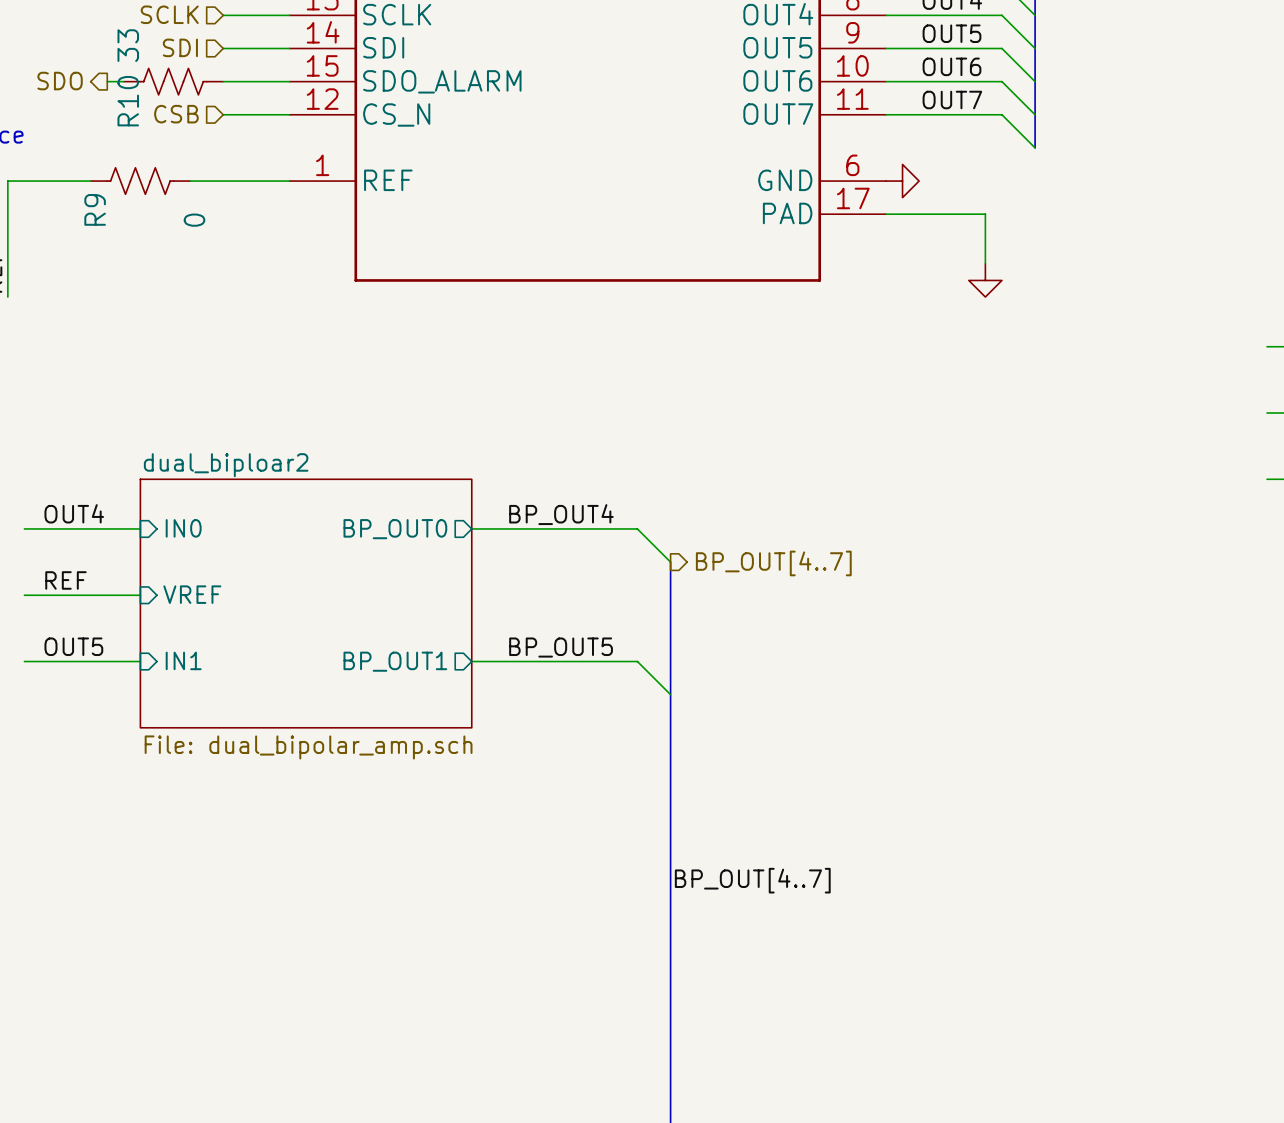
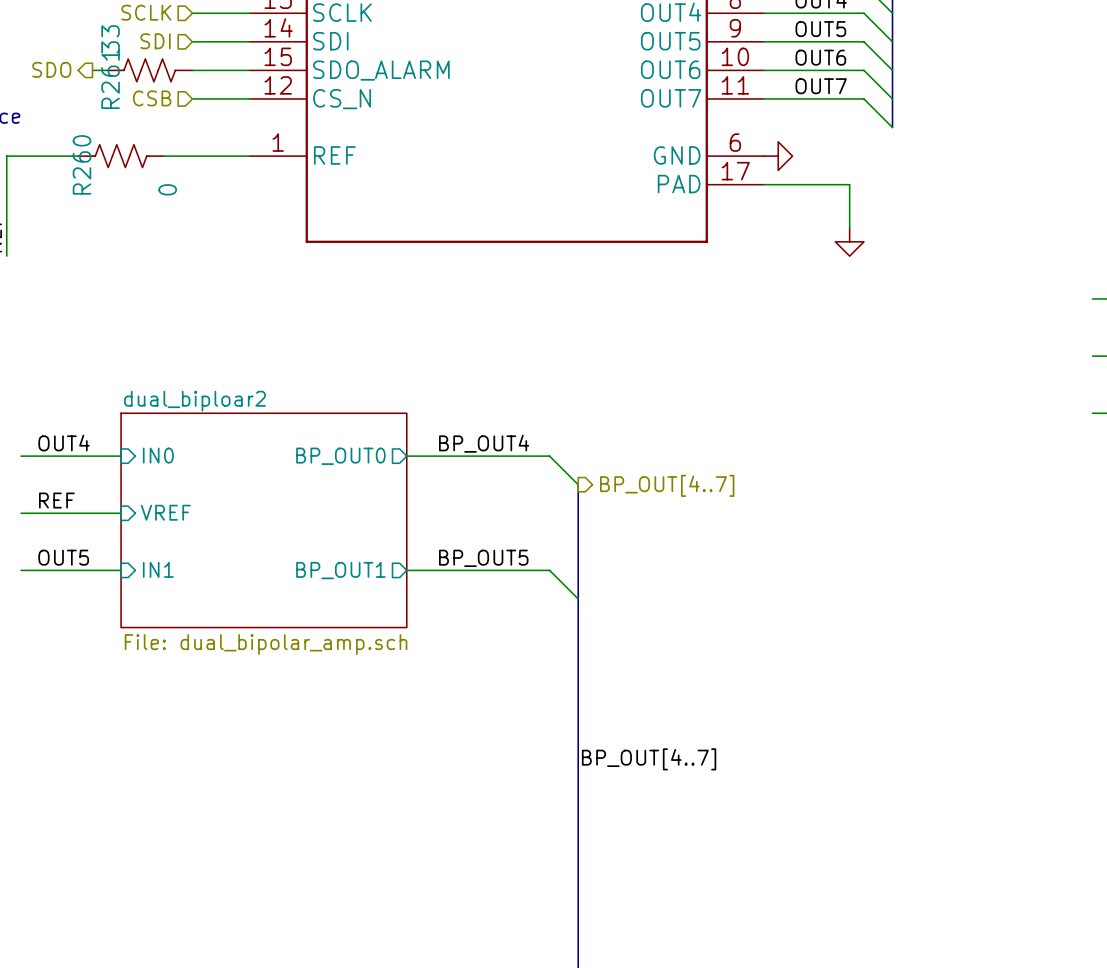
R10 name: R10 (128, 101) -> R261 (110, 79)
R9 name: R9 (95, 209) -> R260 (82, 164)

